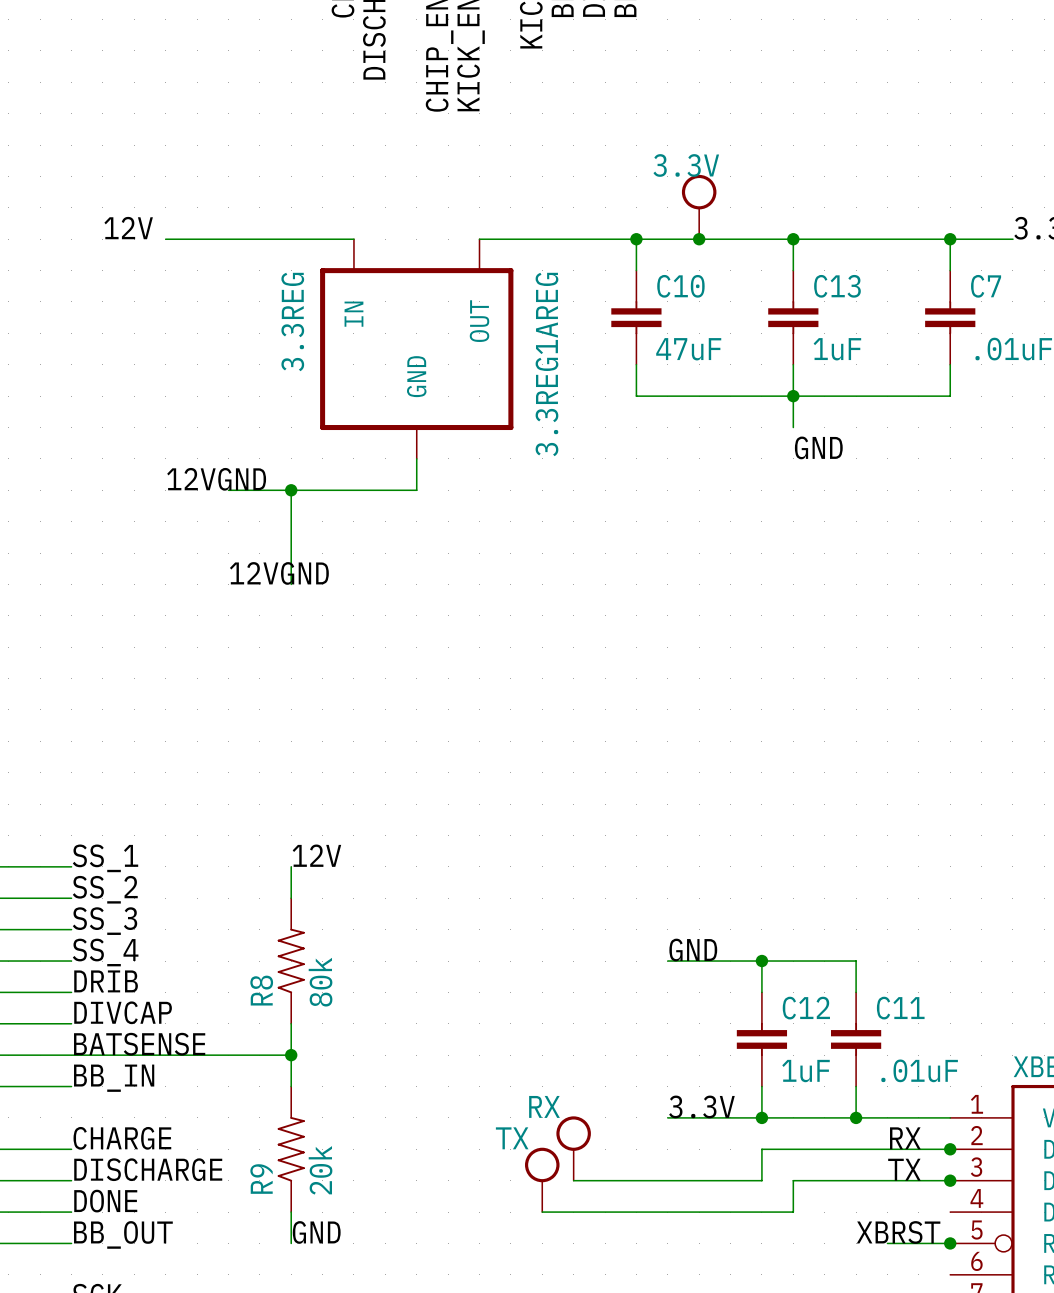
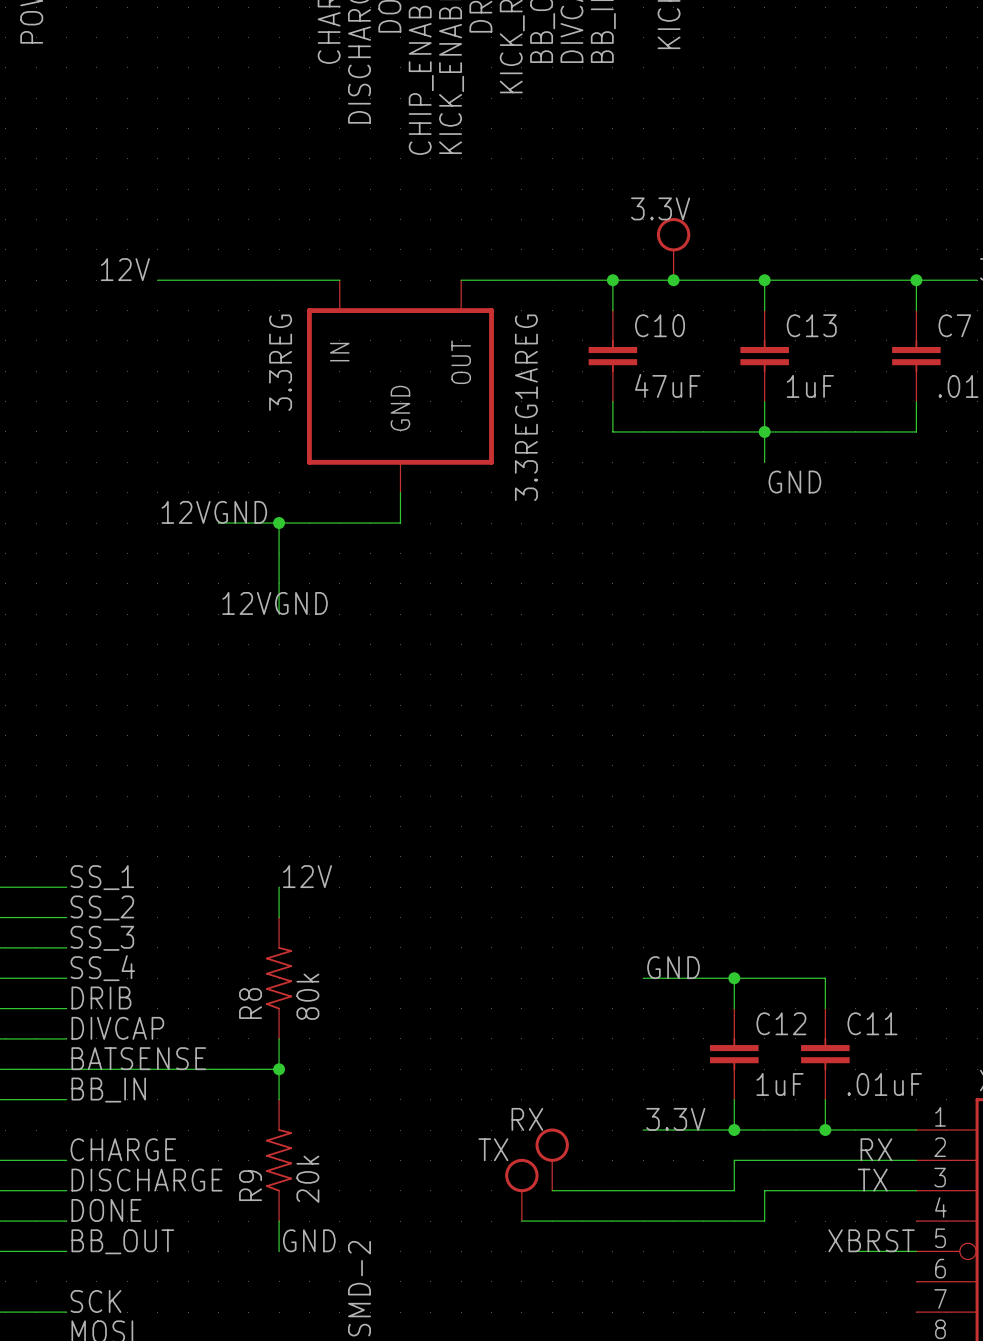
junction: (950, 1149) -> none
junction: (950, 1180) -> none
junction: (950, 1243) -> none

